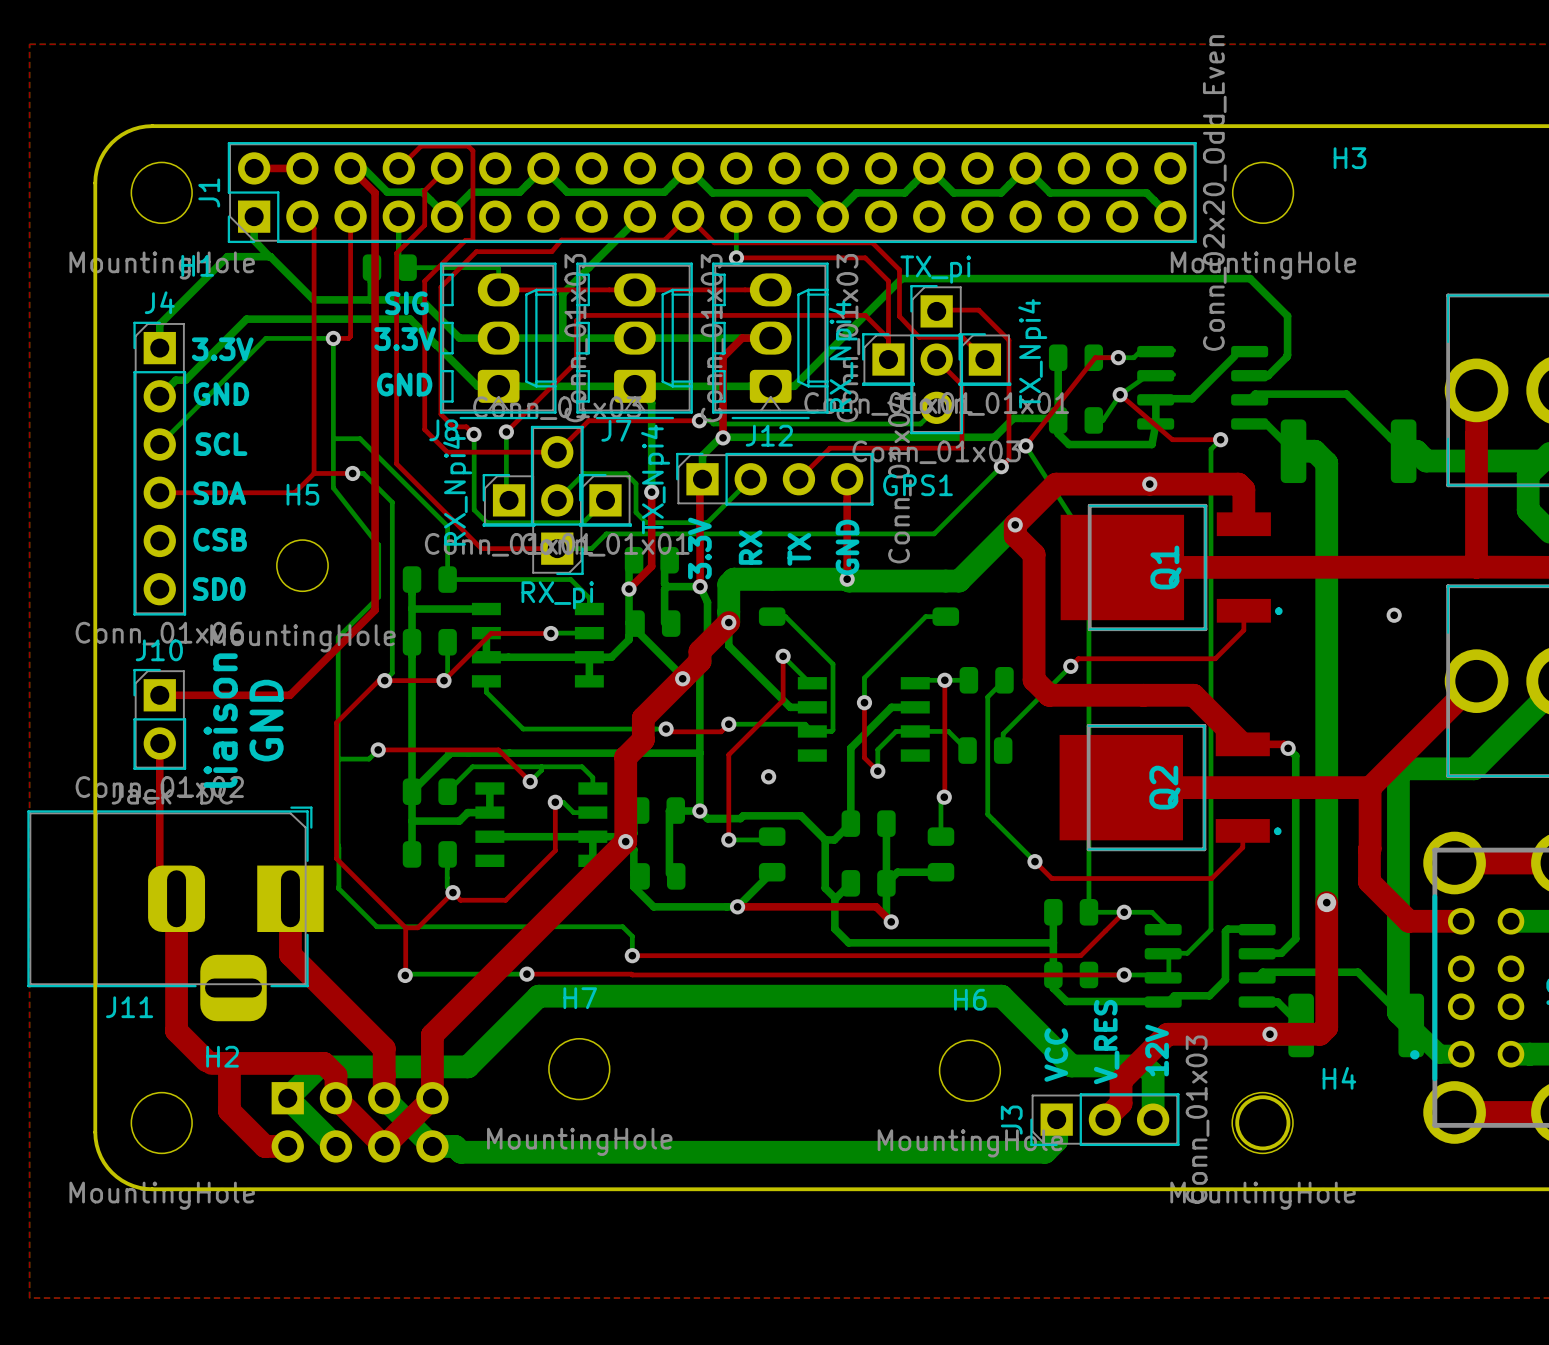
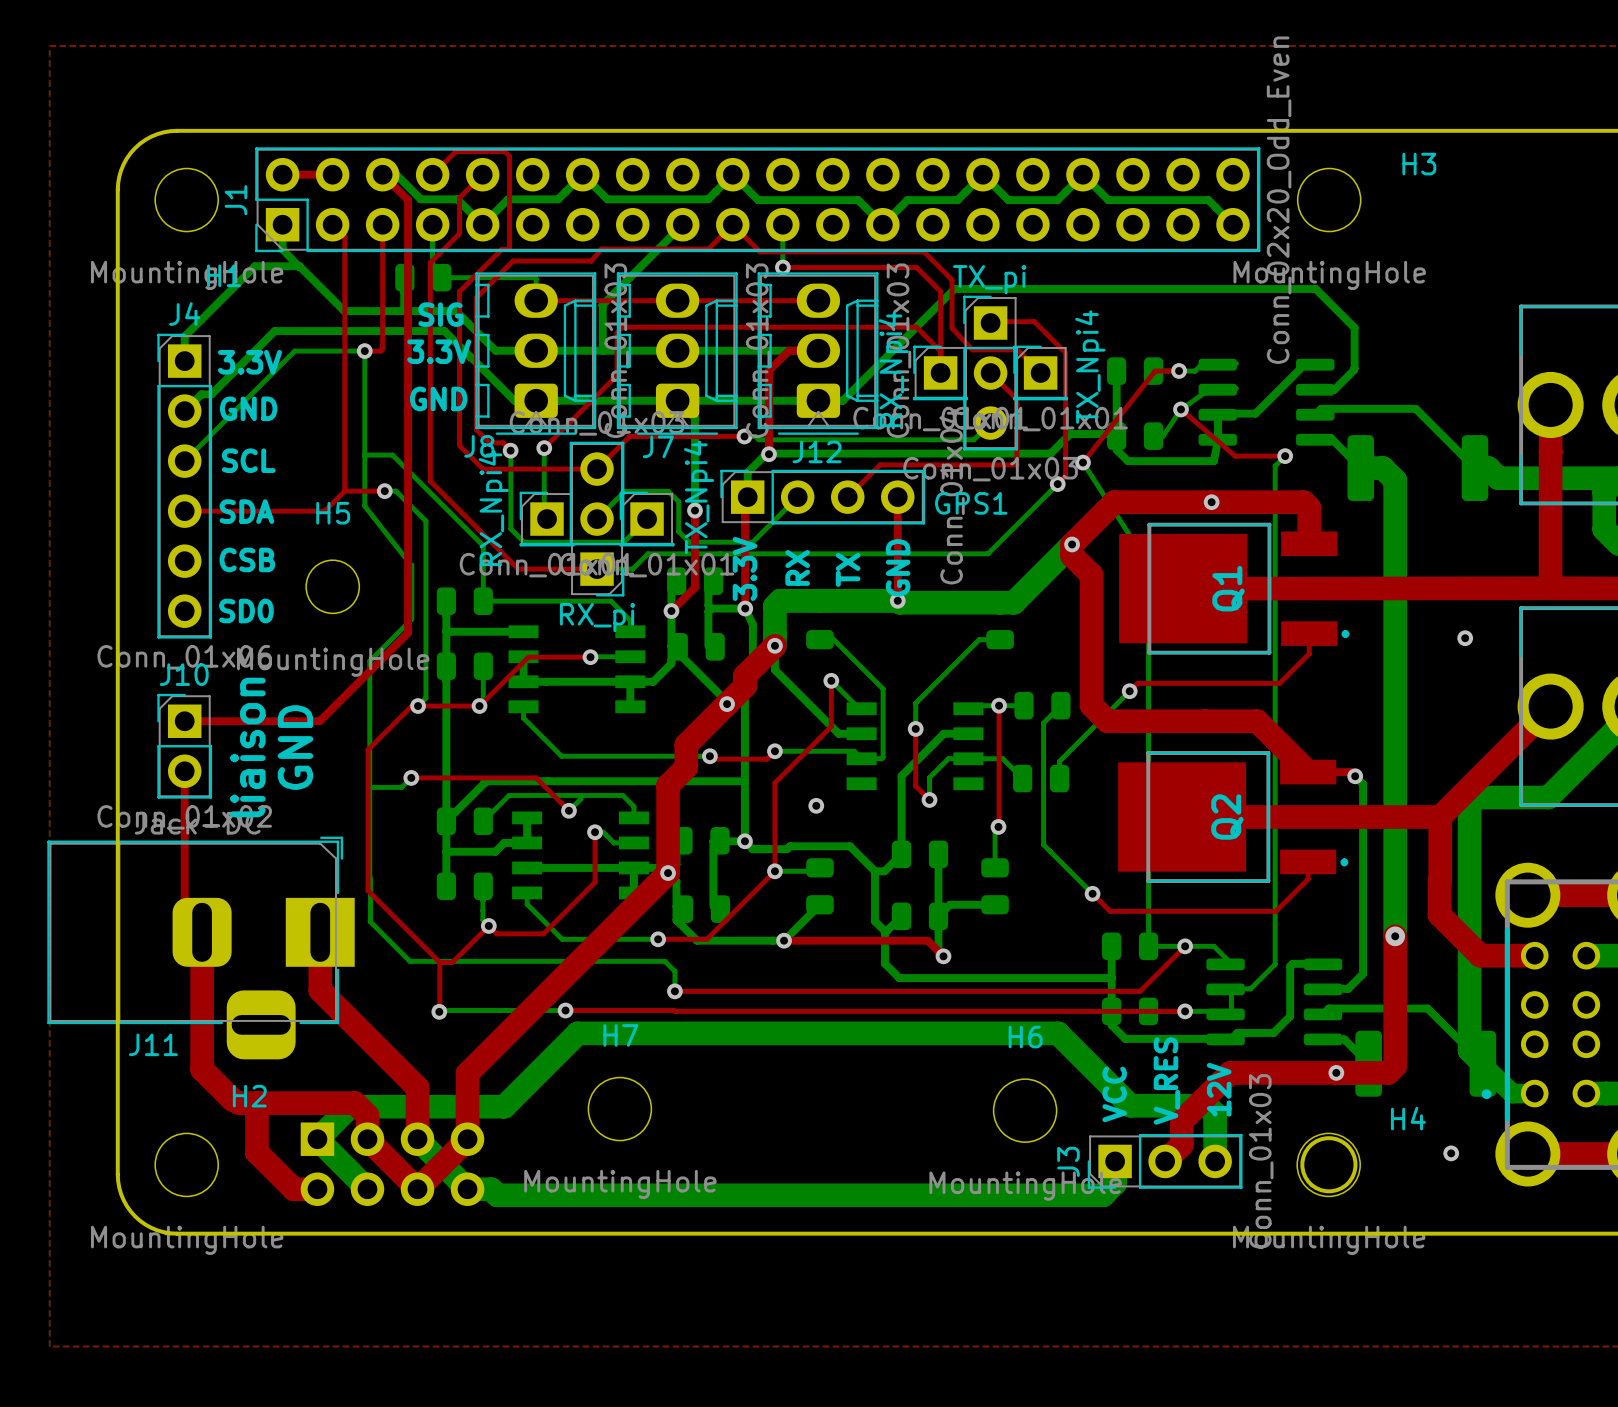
top track: none -> (774, 871) (706, 939) (658, 939)
bottom track: none -> (527, 892) (527, 904) (562, 939) (658, 939)
via: none -> (658, 939)
via: none -> (1451, 1153)

